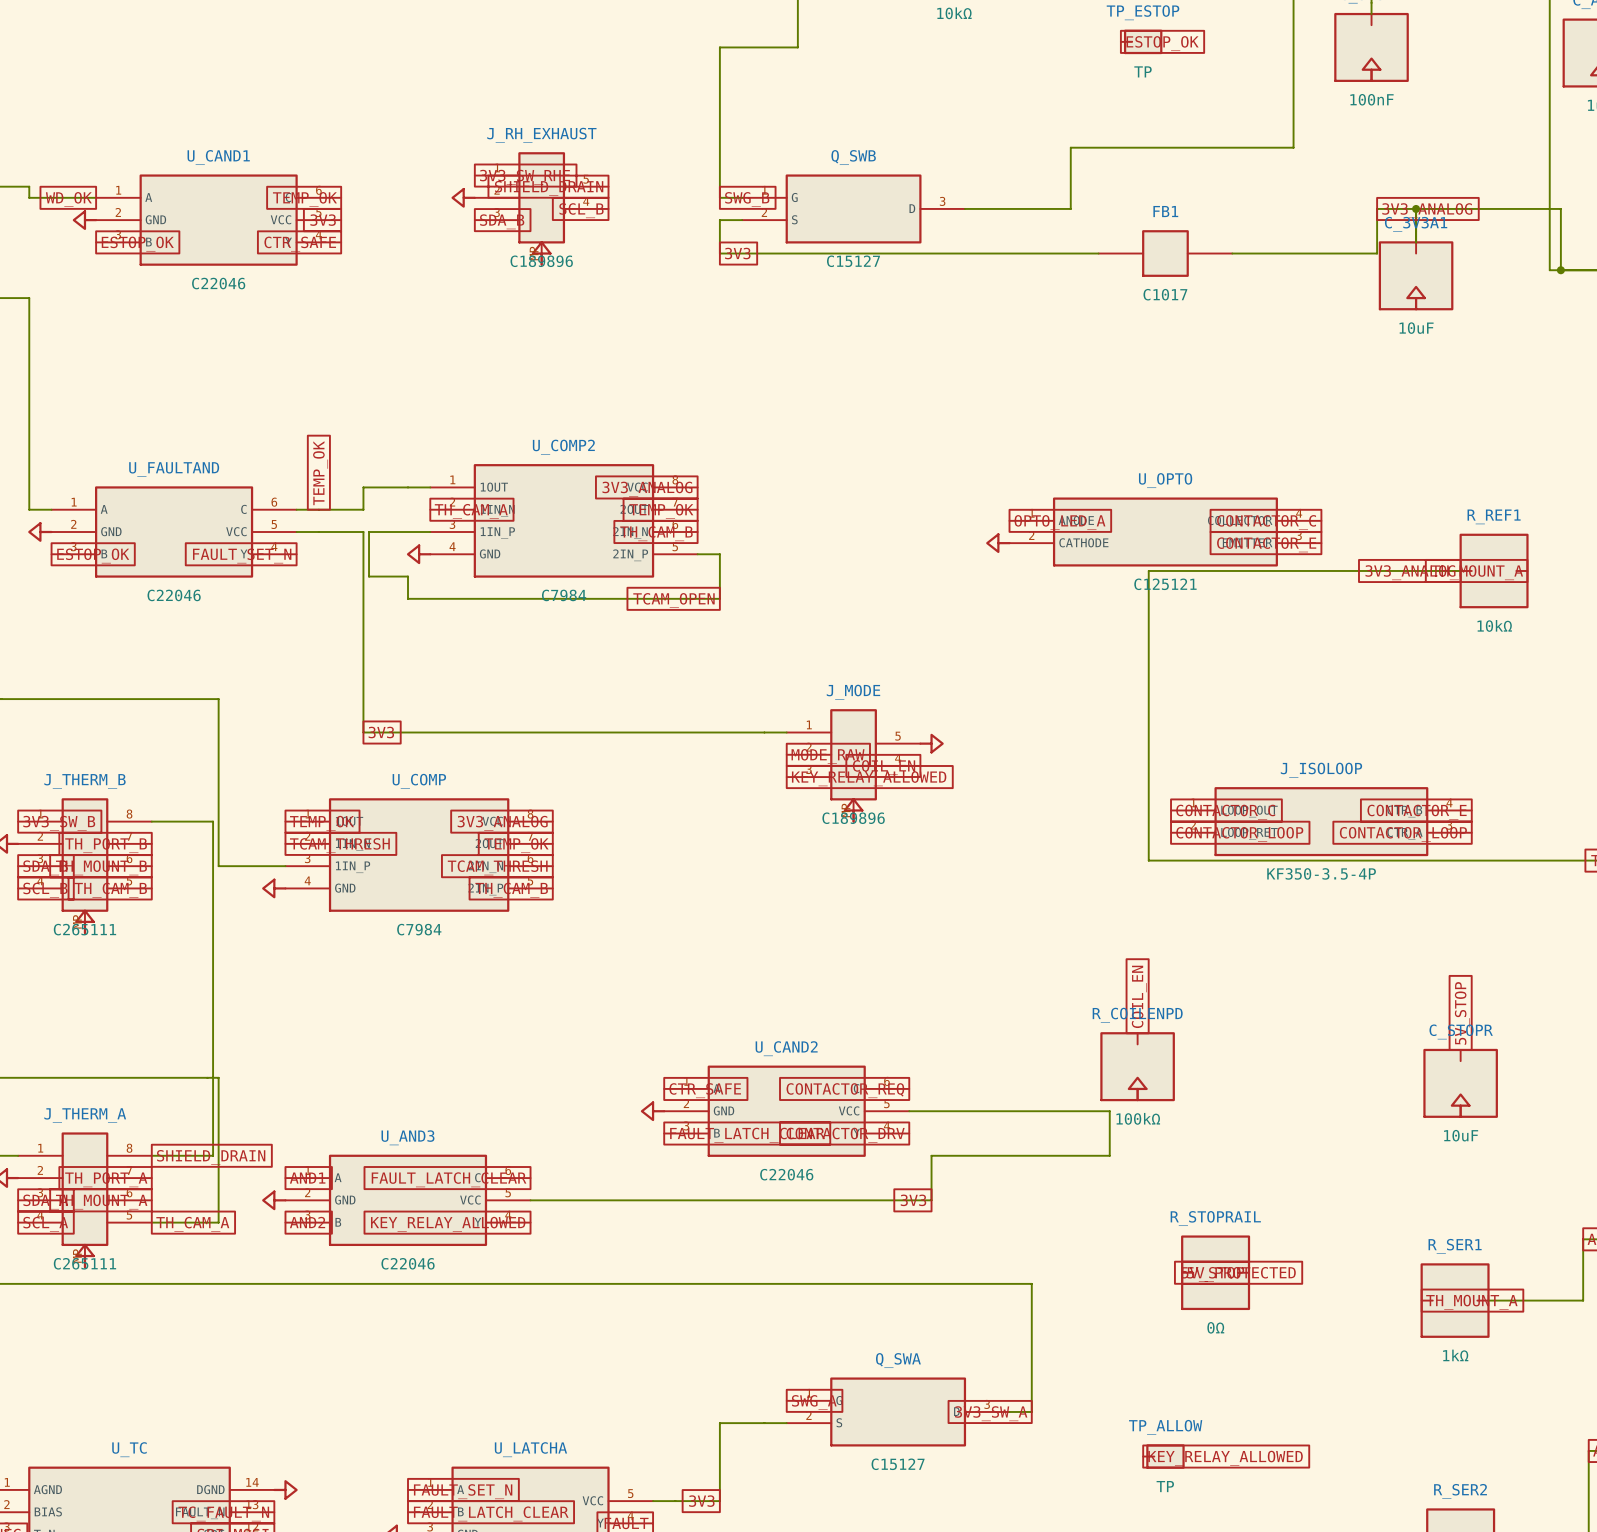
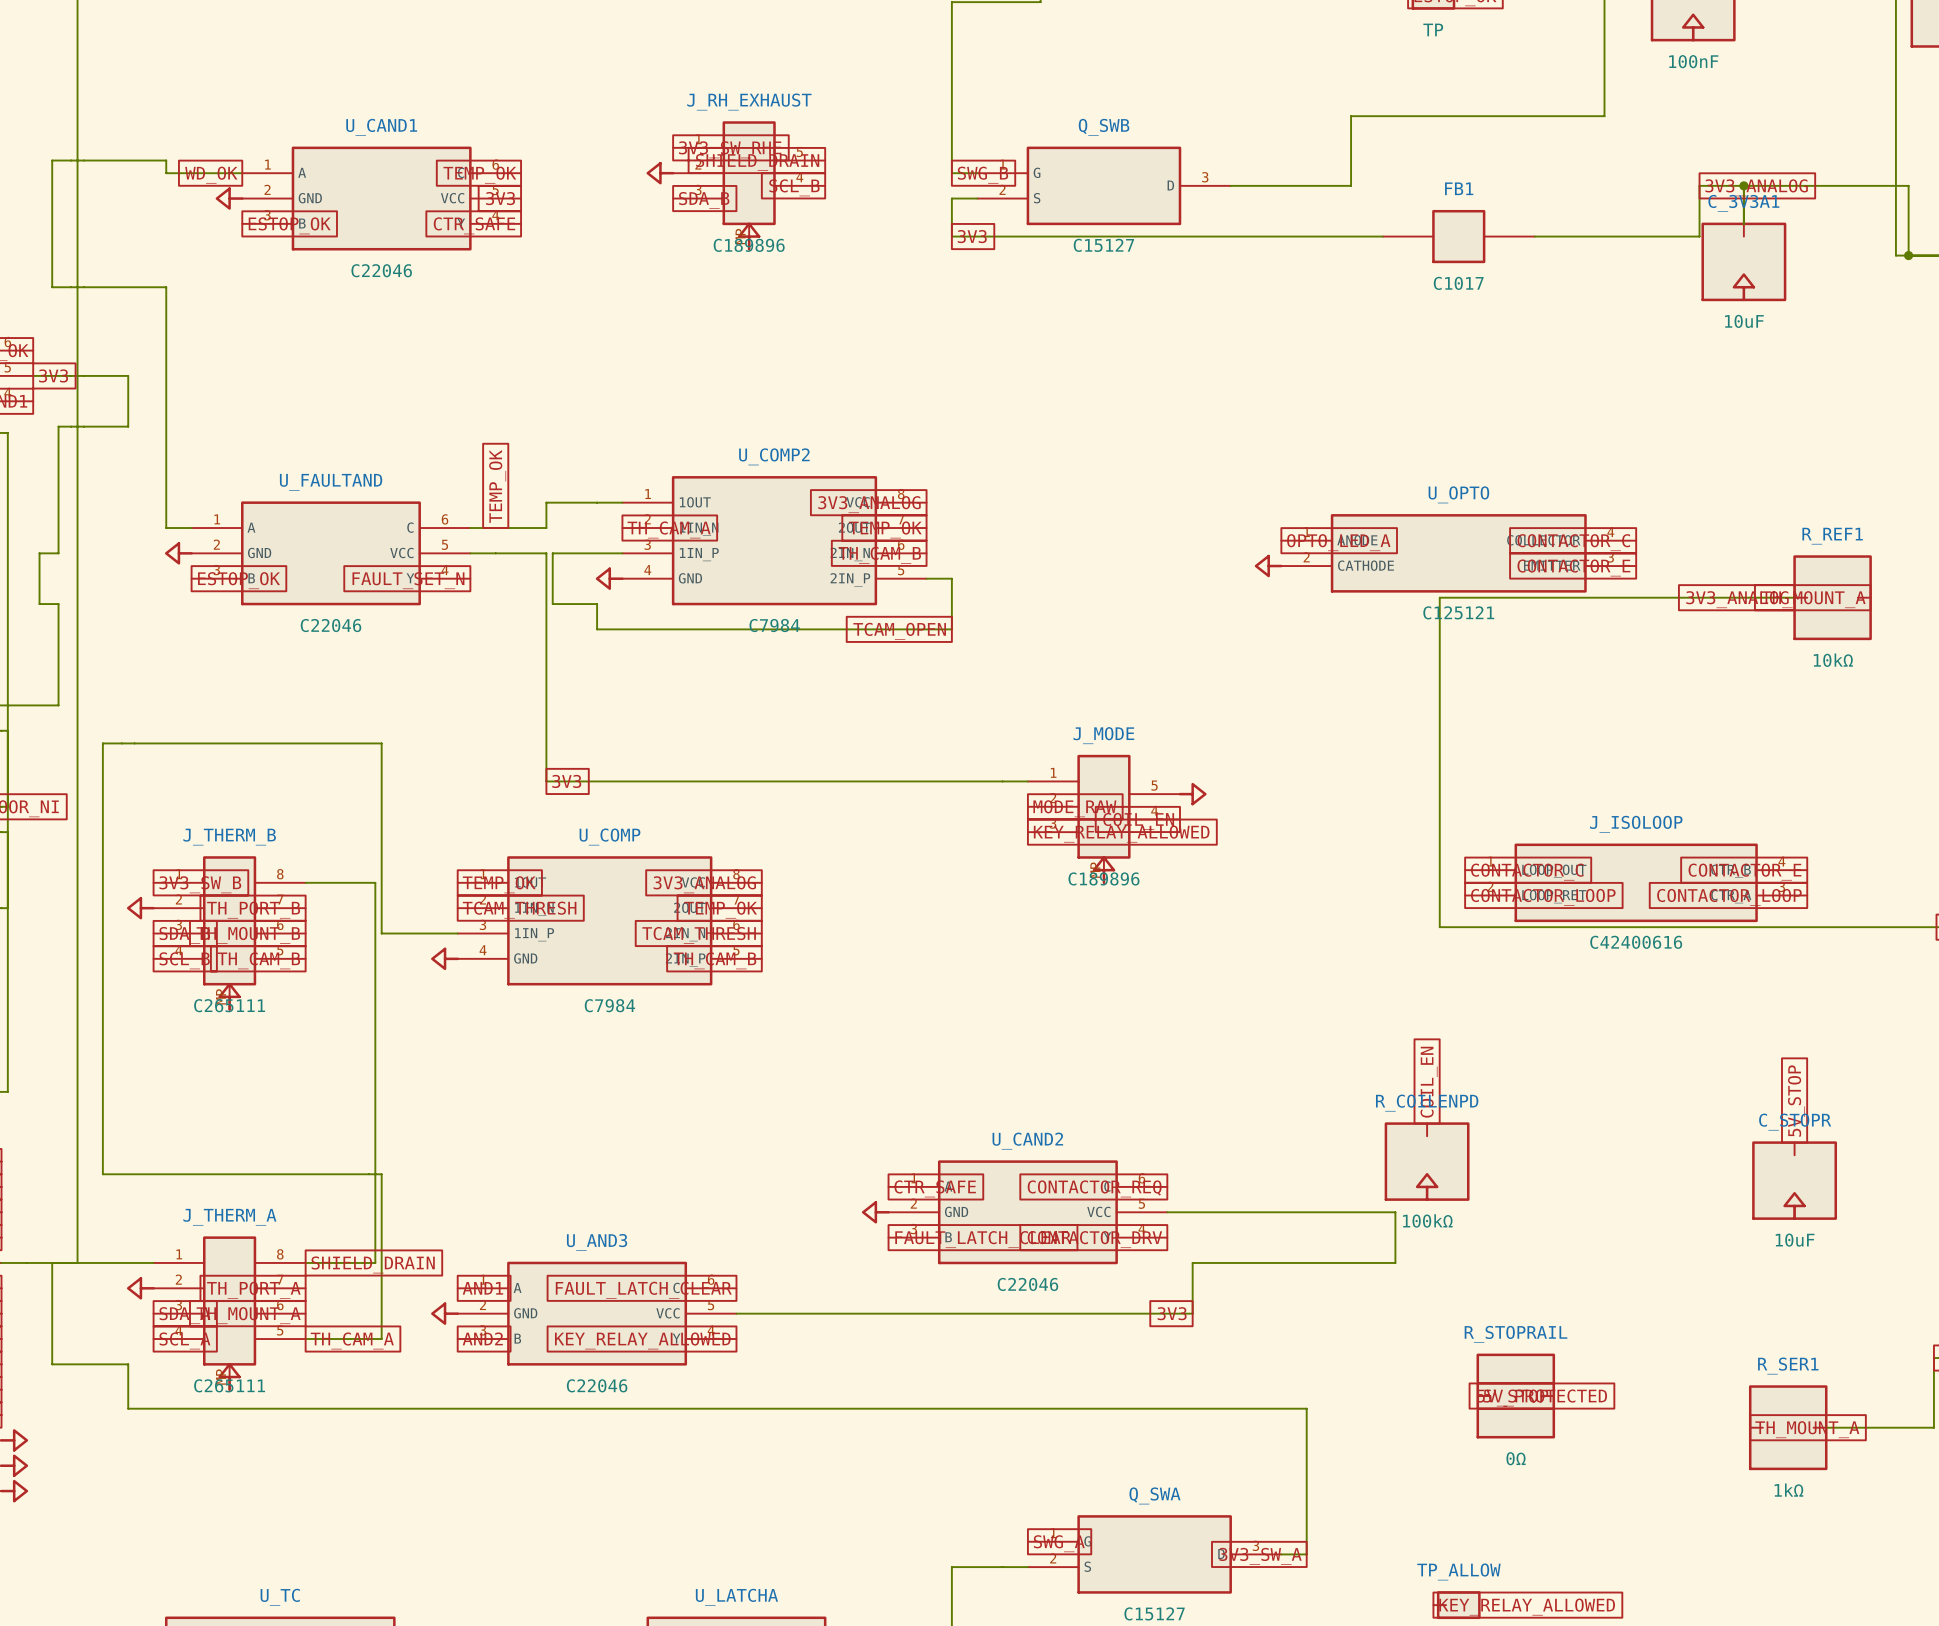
J_ISOLOOP value: KF350-3.5-4P (1321, 873) -> C42400616 (1636, 942)

